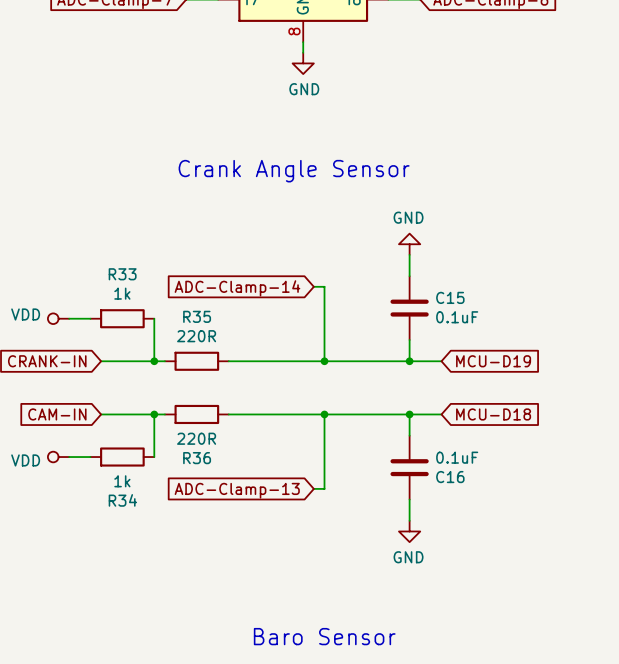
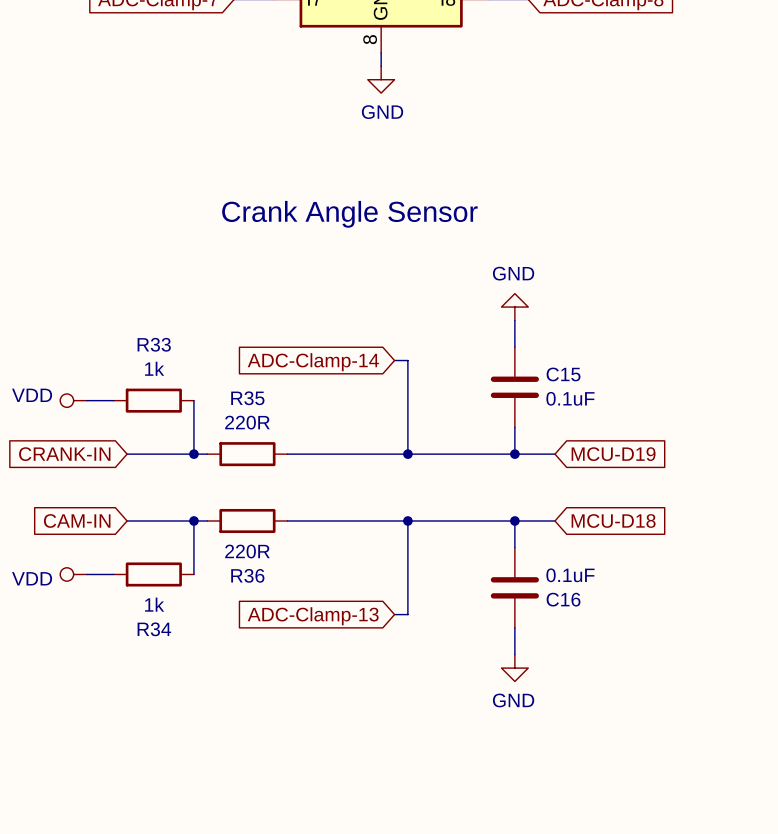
text: Baro Sensor (324, 636) -> none

